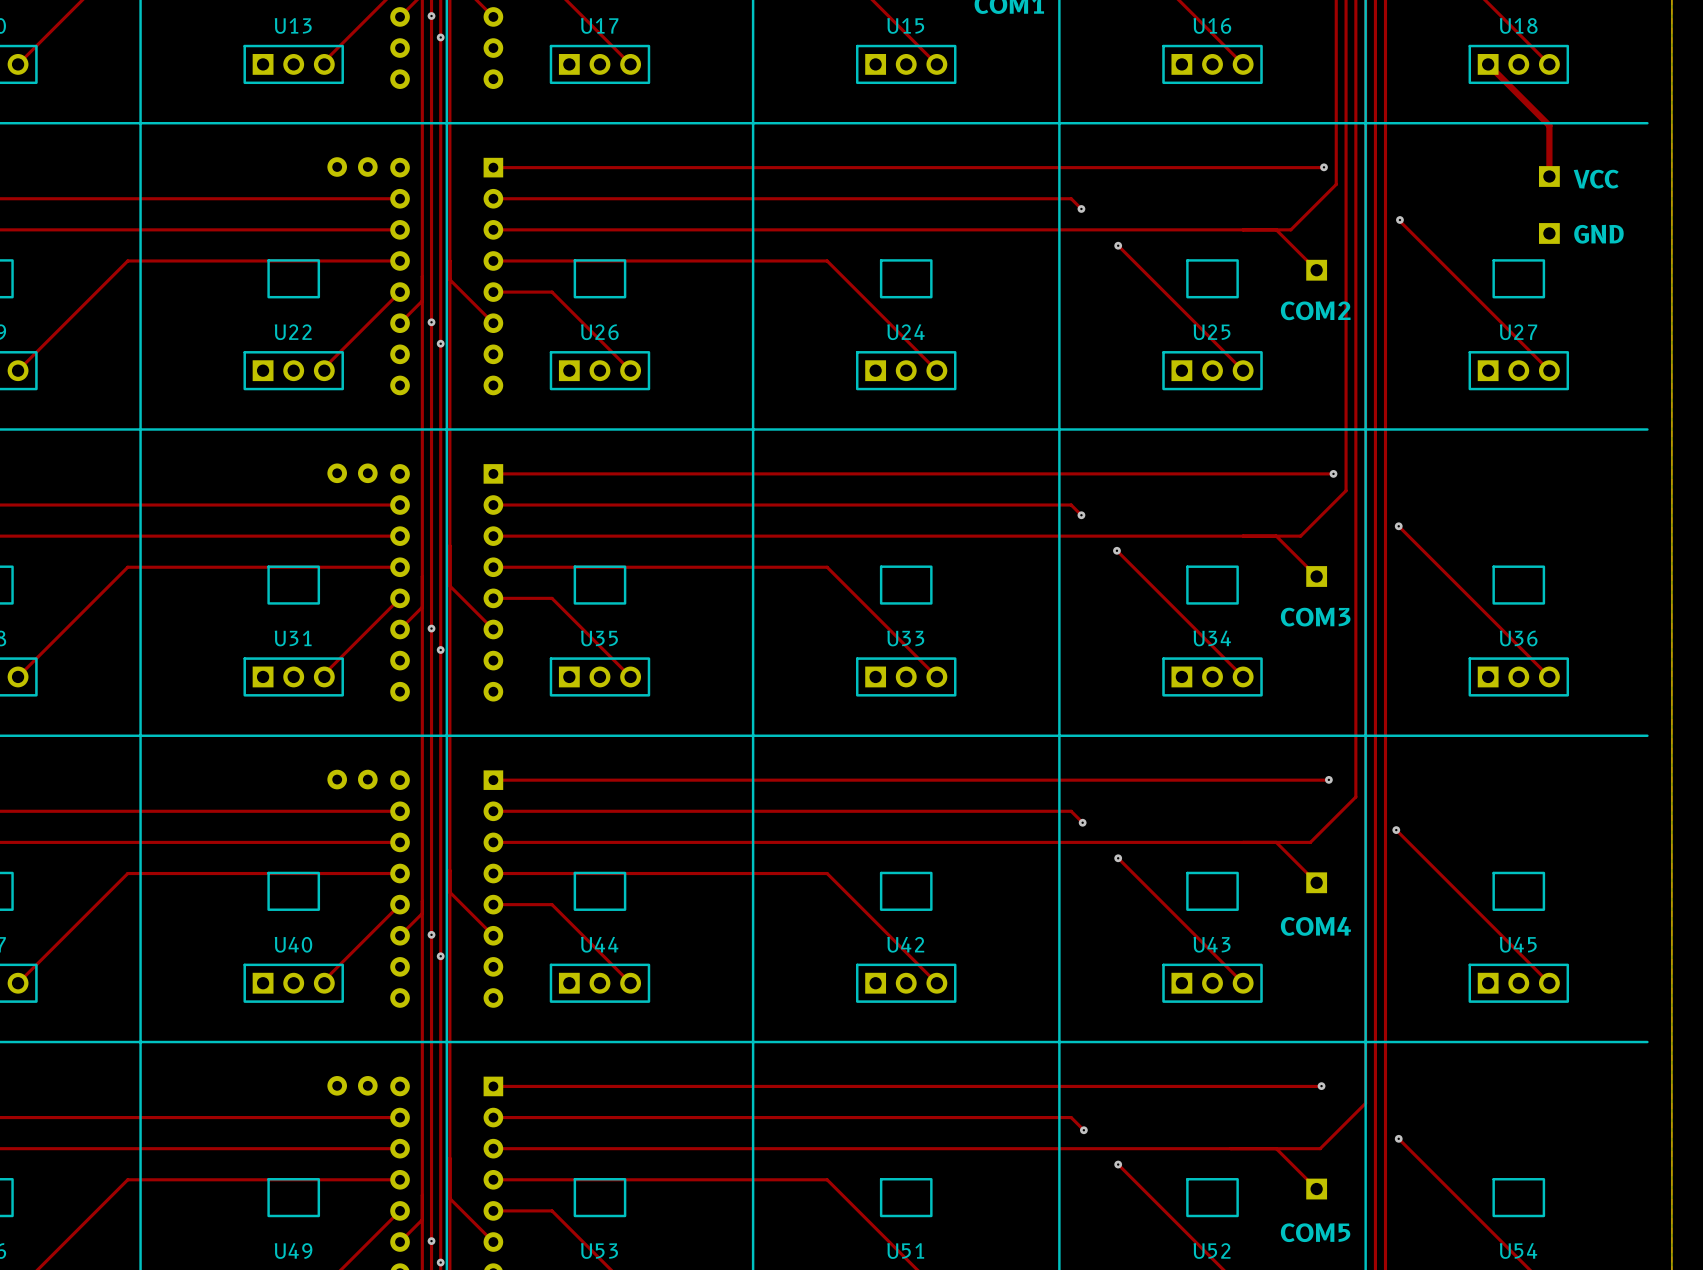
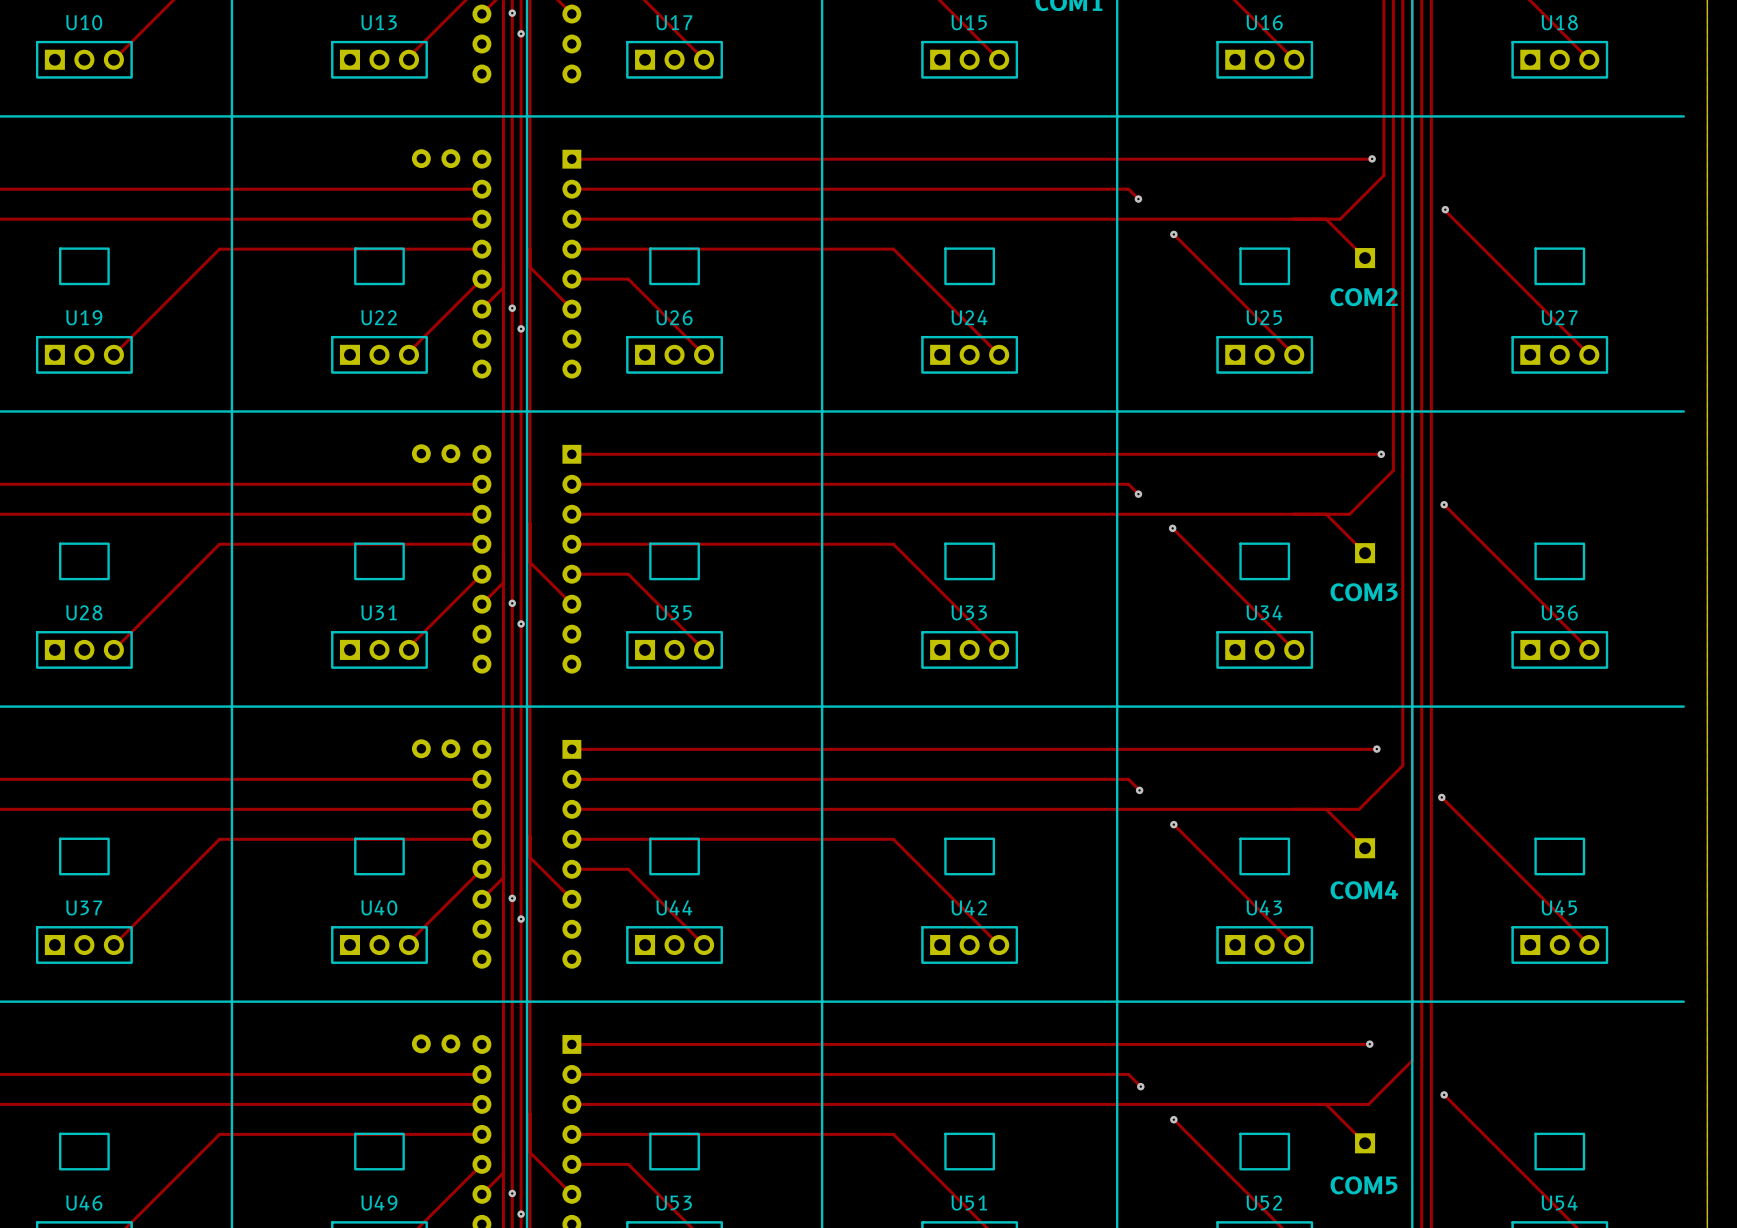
track: (1488, 64) (1549, 125) (1549, 176) -> none
part: (1549, 176) -> none
text: VCC (1596, 179) -> none
part: (1549, 233) -> none
text: GND (1598, 234) -> none

